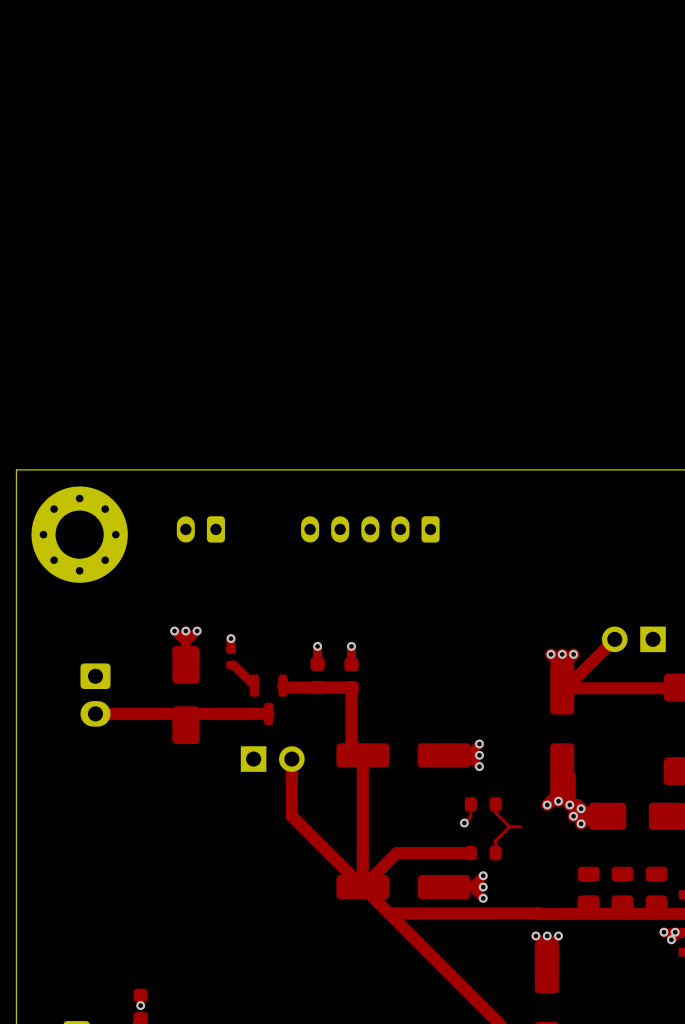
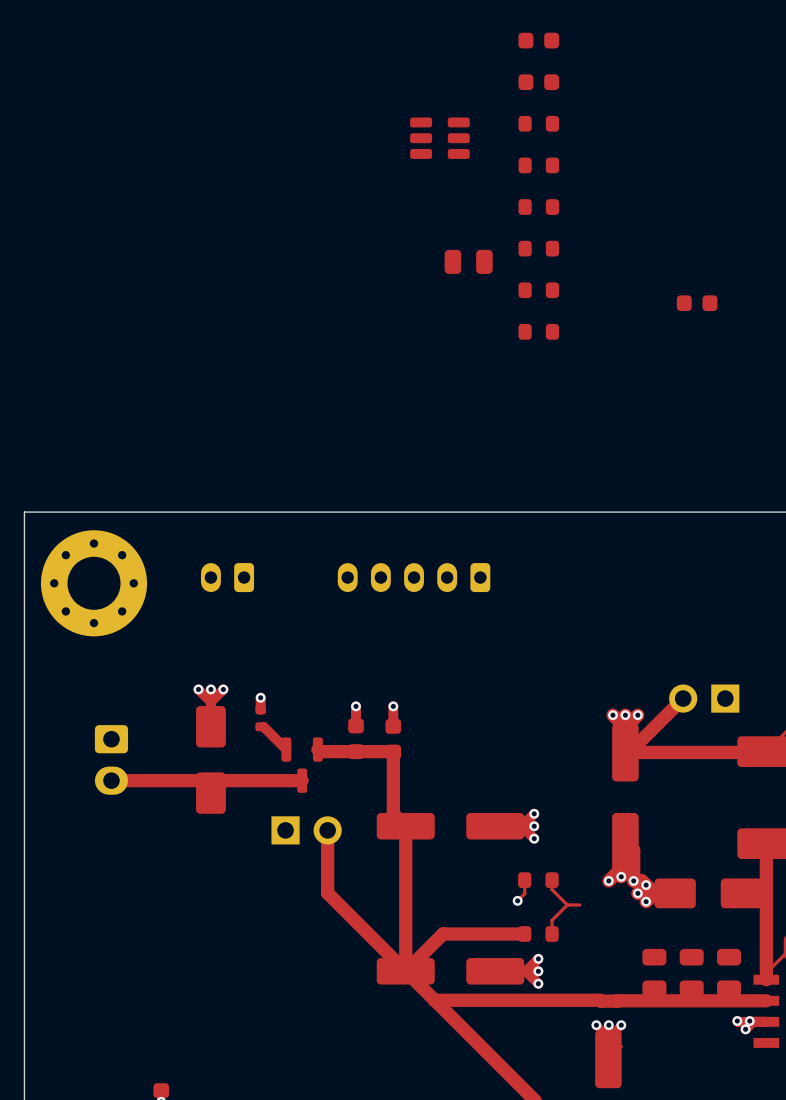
part: none -> (538, 40)
part: none -> (538, 82)
part: none -> (538, 123)
part: none -> (439, 138)
part: none -> (538, 165)
part: none -> (538, 207)
part: none -> (538, 248)
part: none -> (468, 261)
part: none -> (538, 290)
part: none -> (697, 303)
part: none -> (538, 331)

